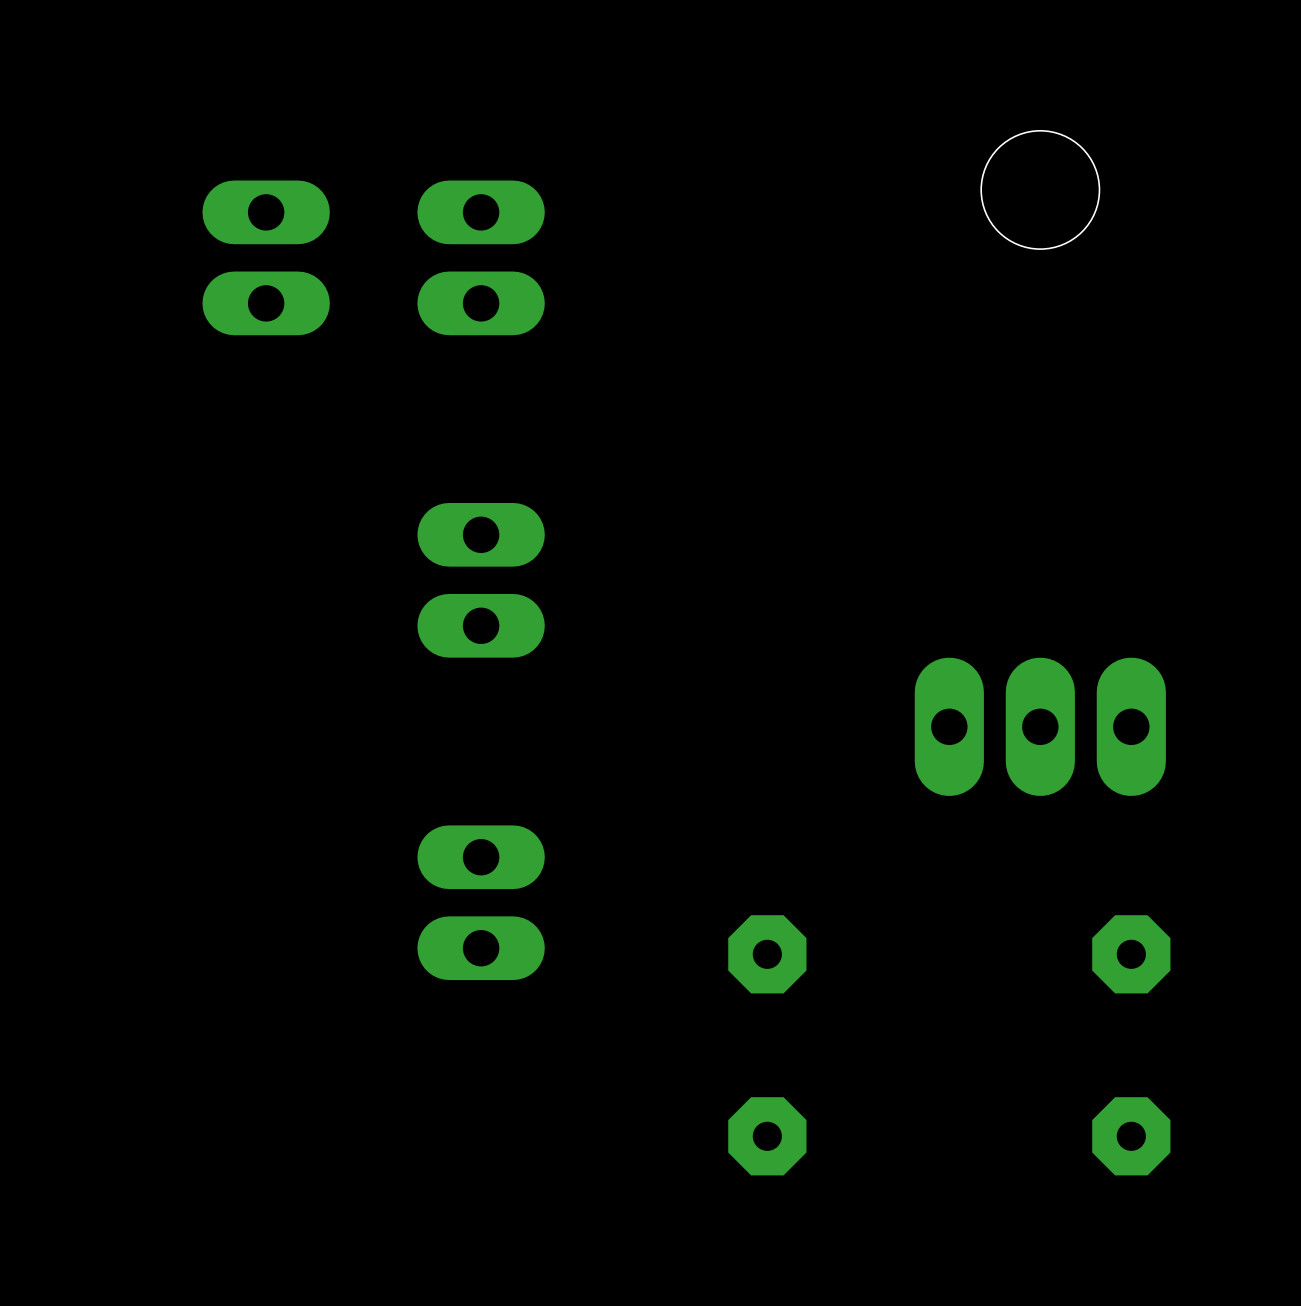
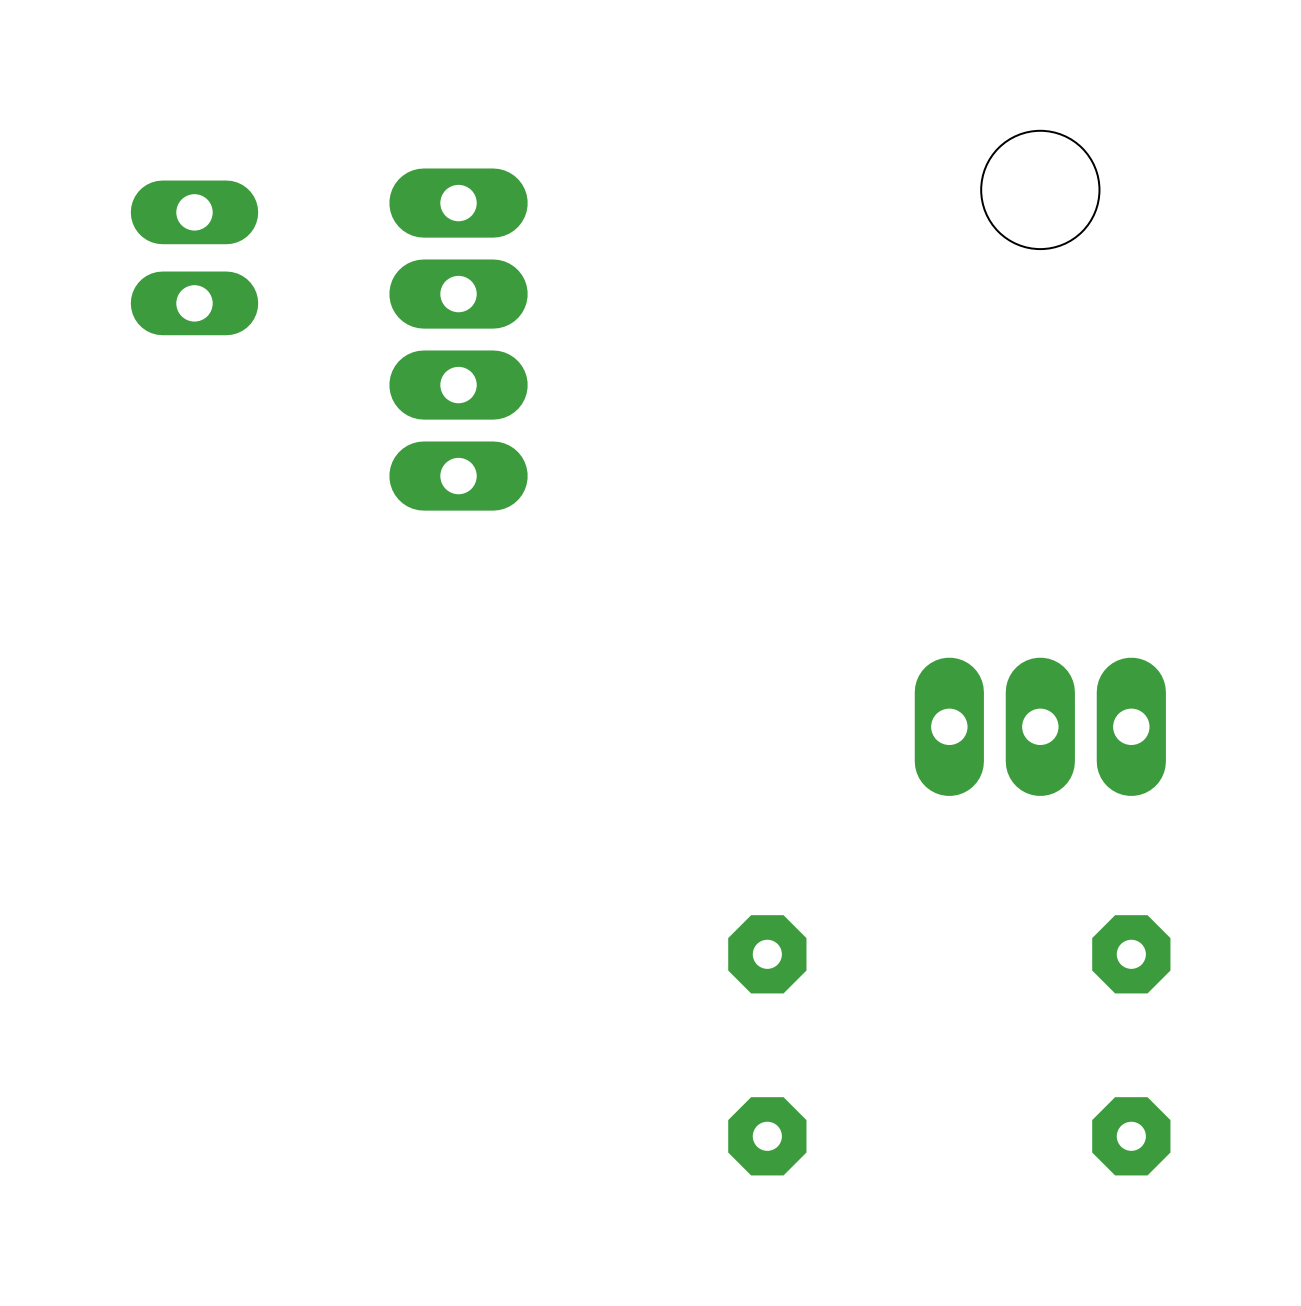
part position: (266, 257) -> (194, 257)
part: (481, 257) -> none
part: none -> (458, 339)
part: (481, 580) -> none
part: (481, 902) -> none

